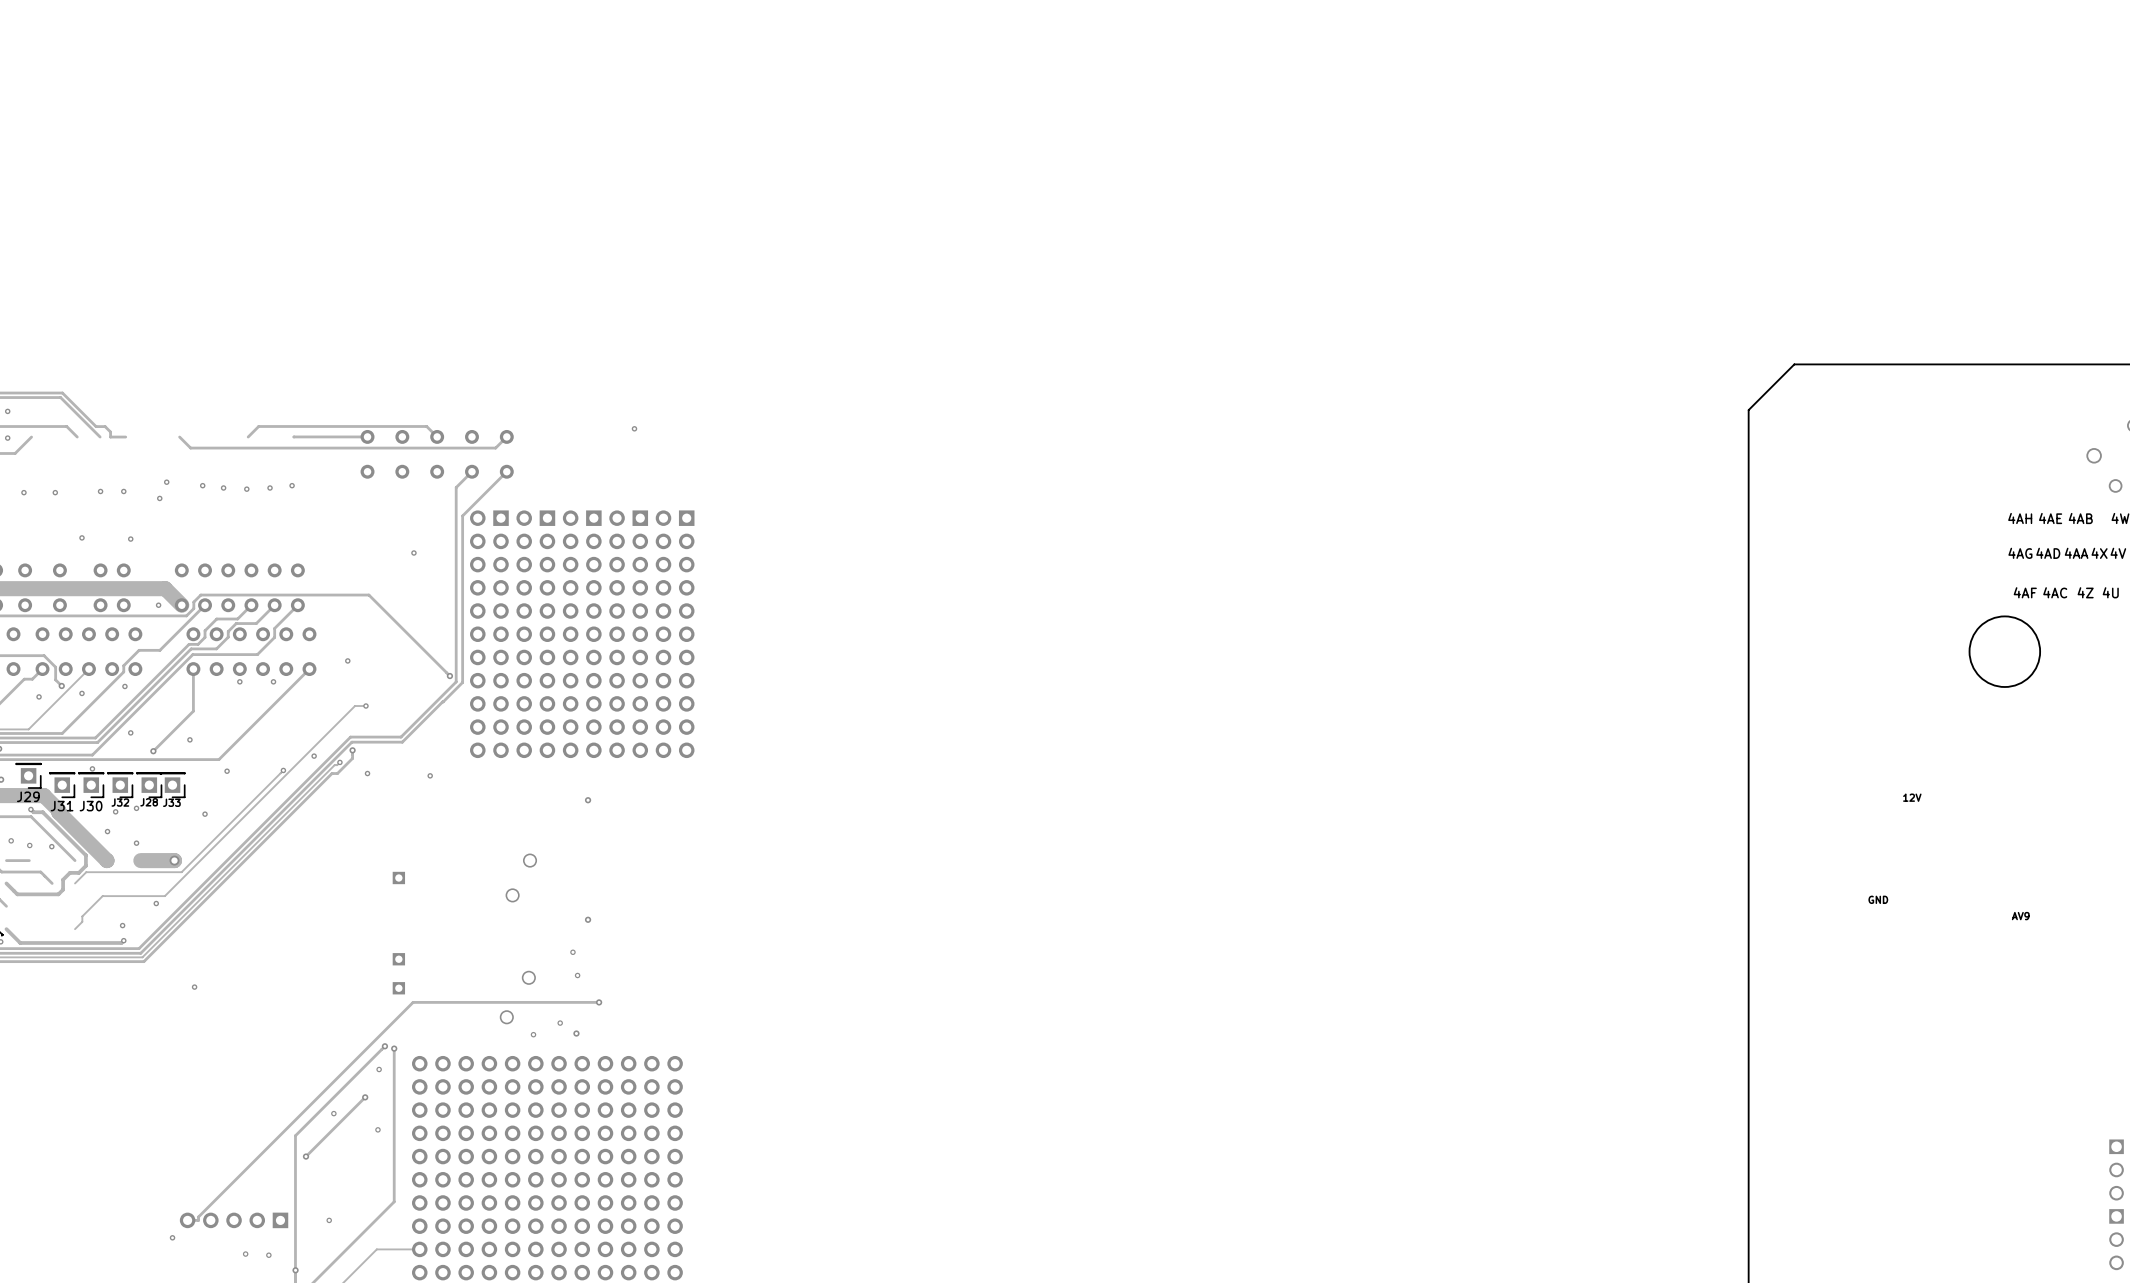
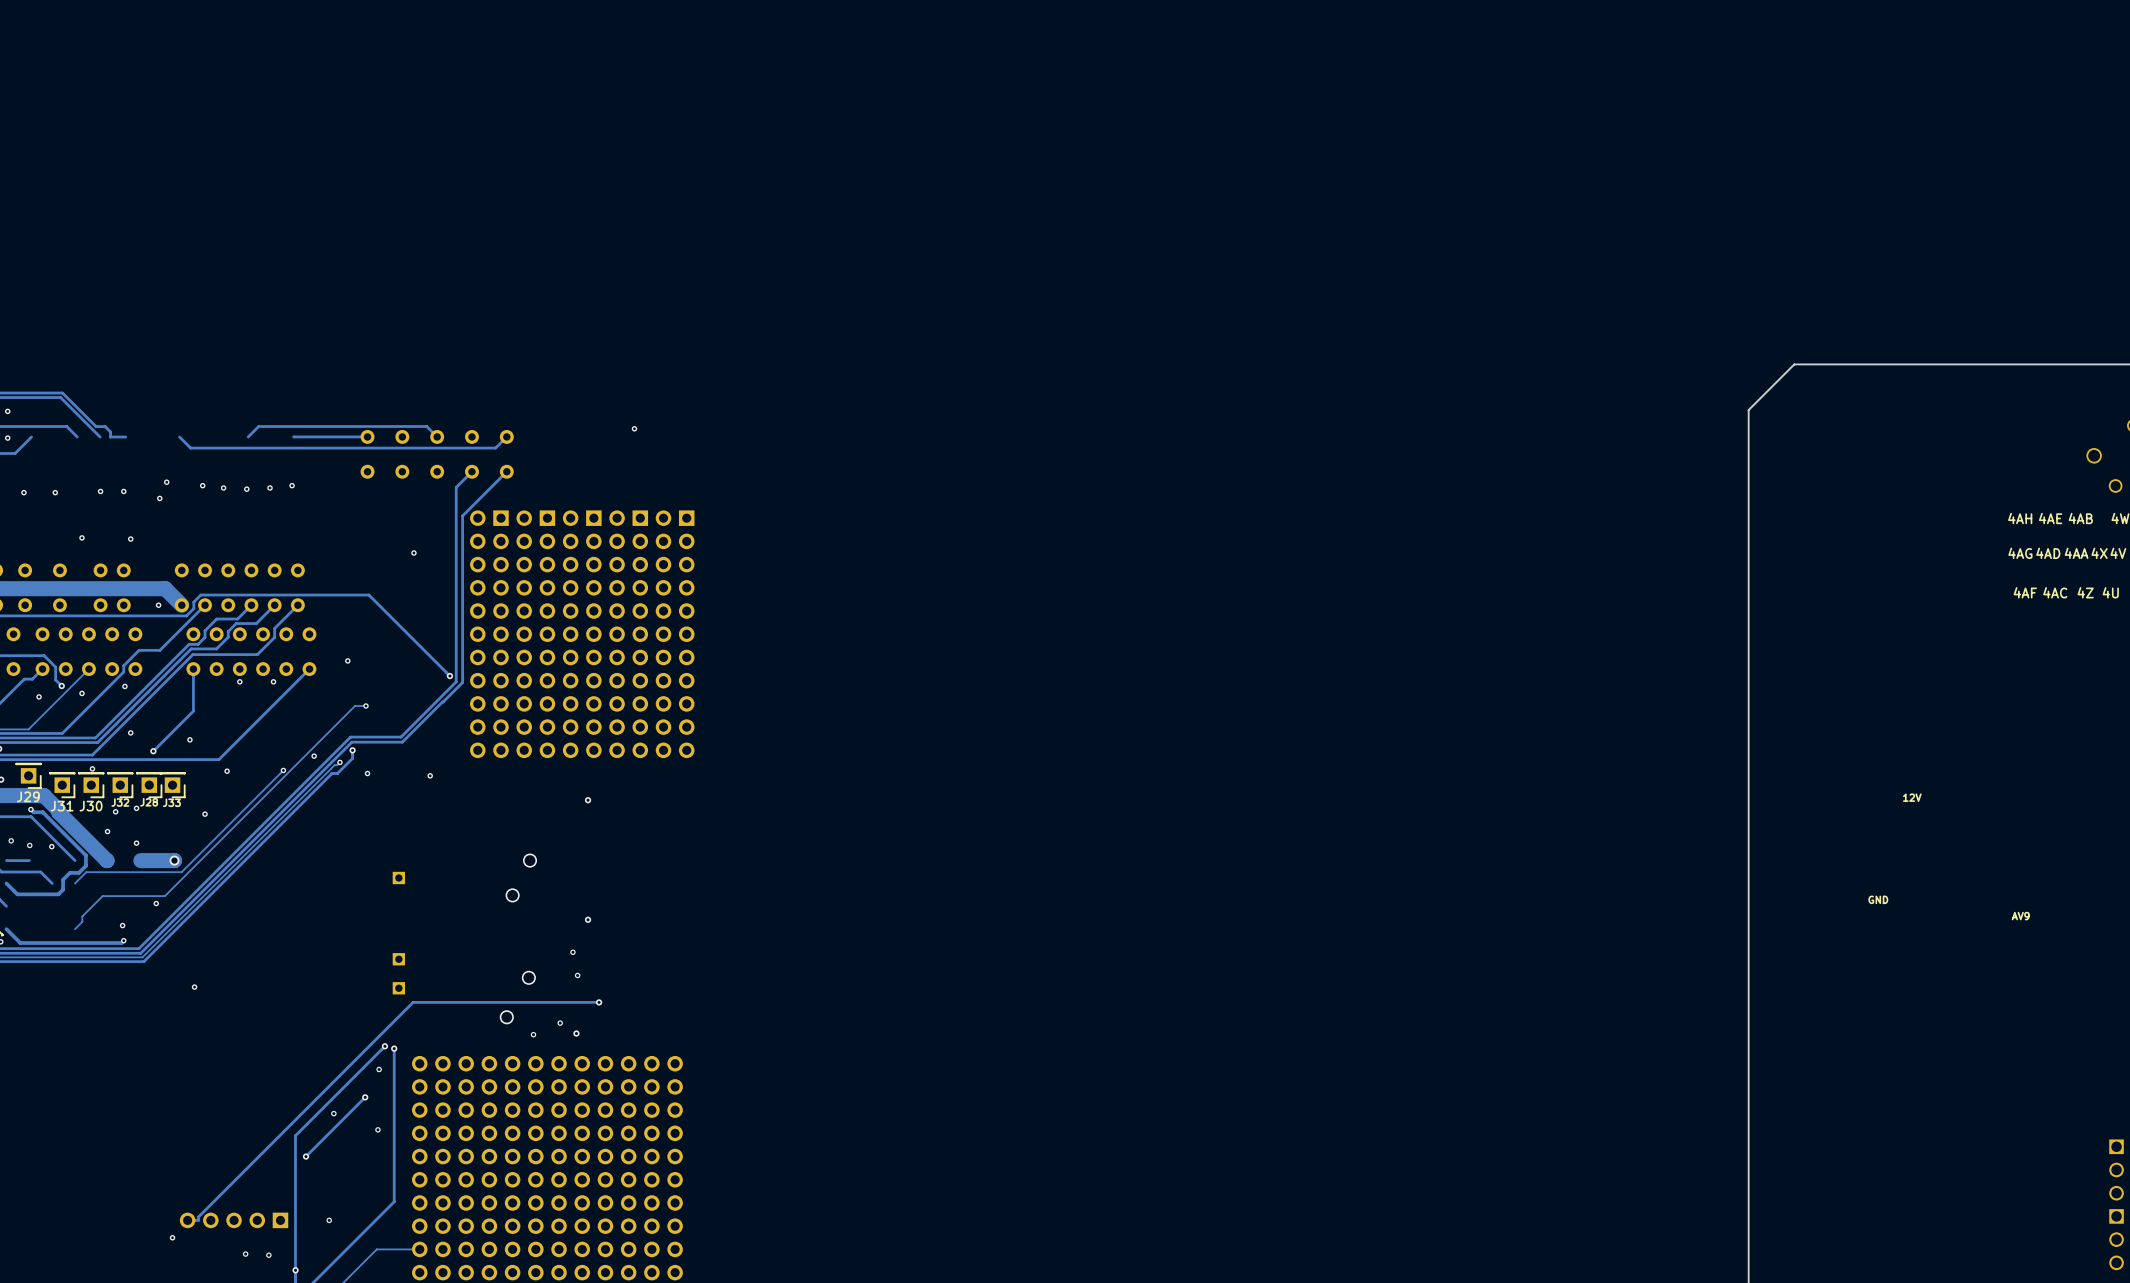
round board edge: [1968, 615, 2042, 688] -> none

